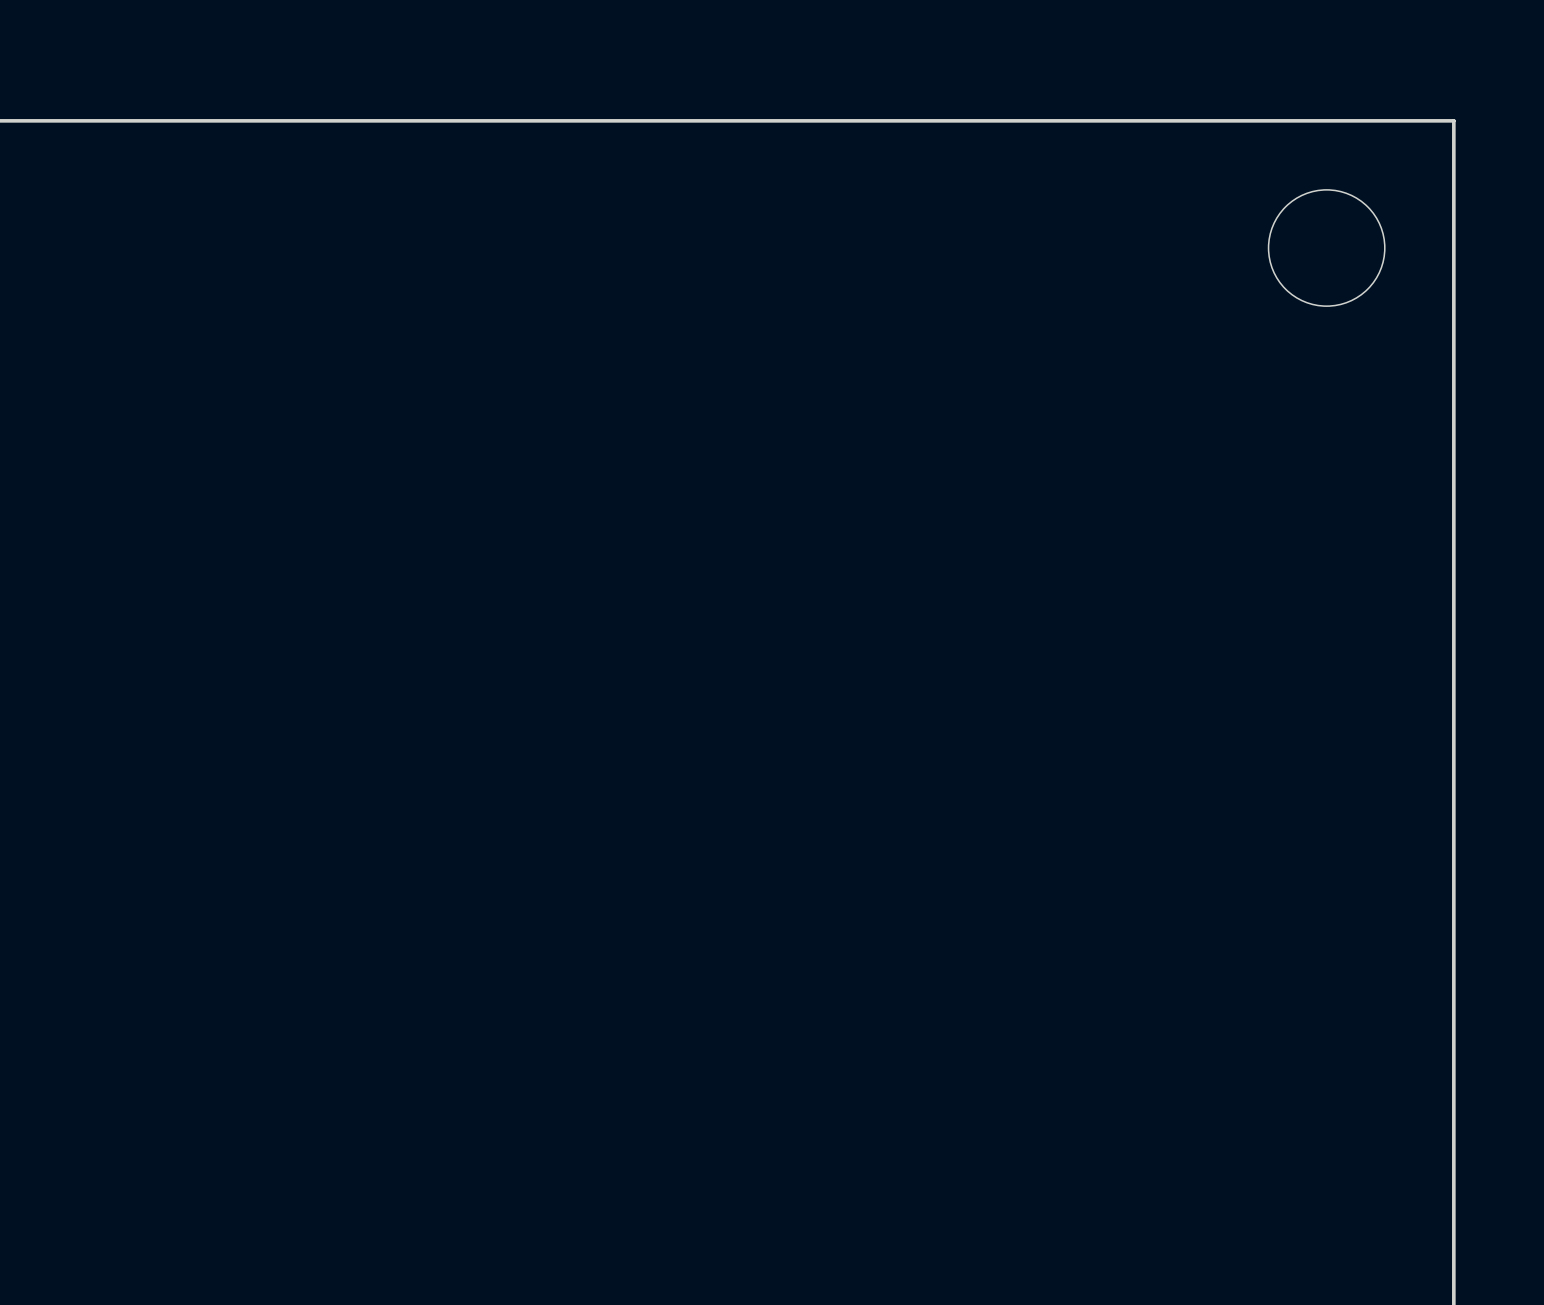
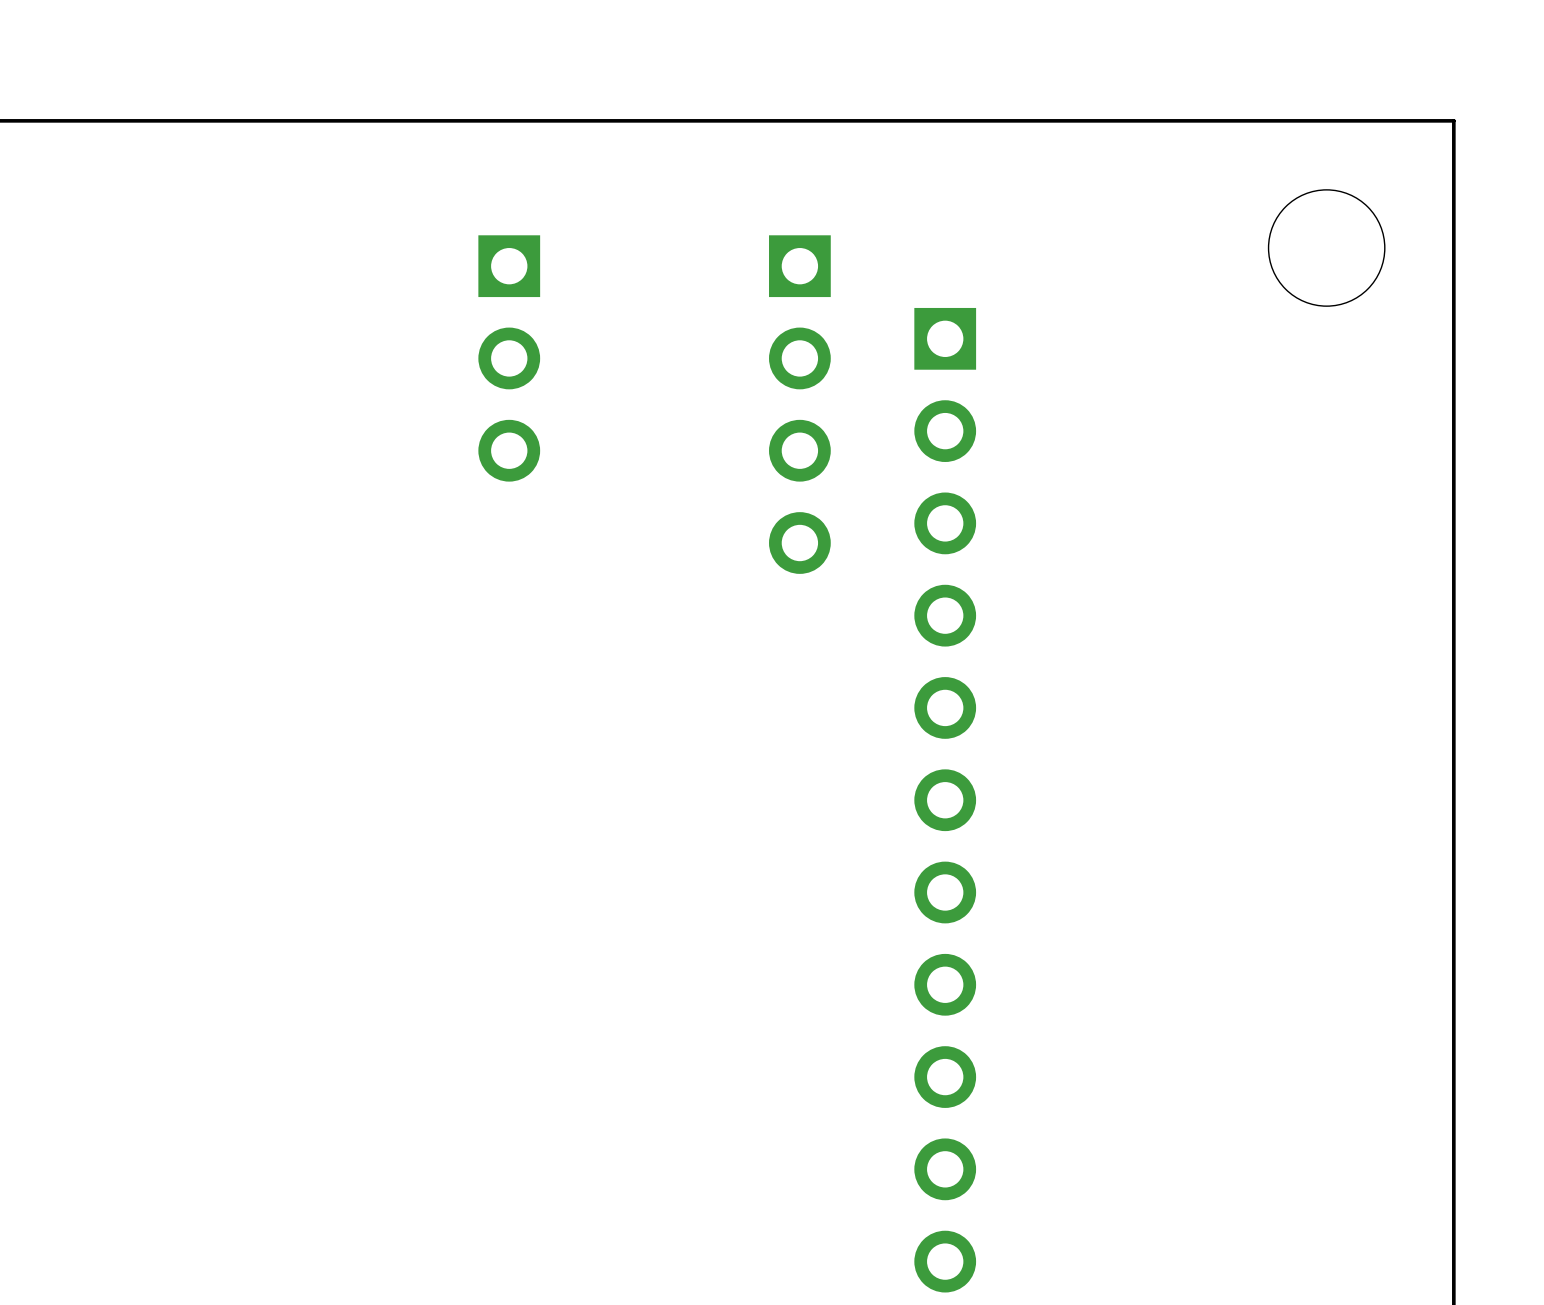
part: none -> (509, 358)
part: none -> (799, 404)
part: none -> (945, 800)

